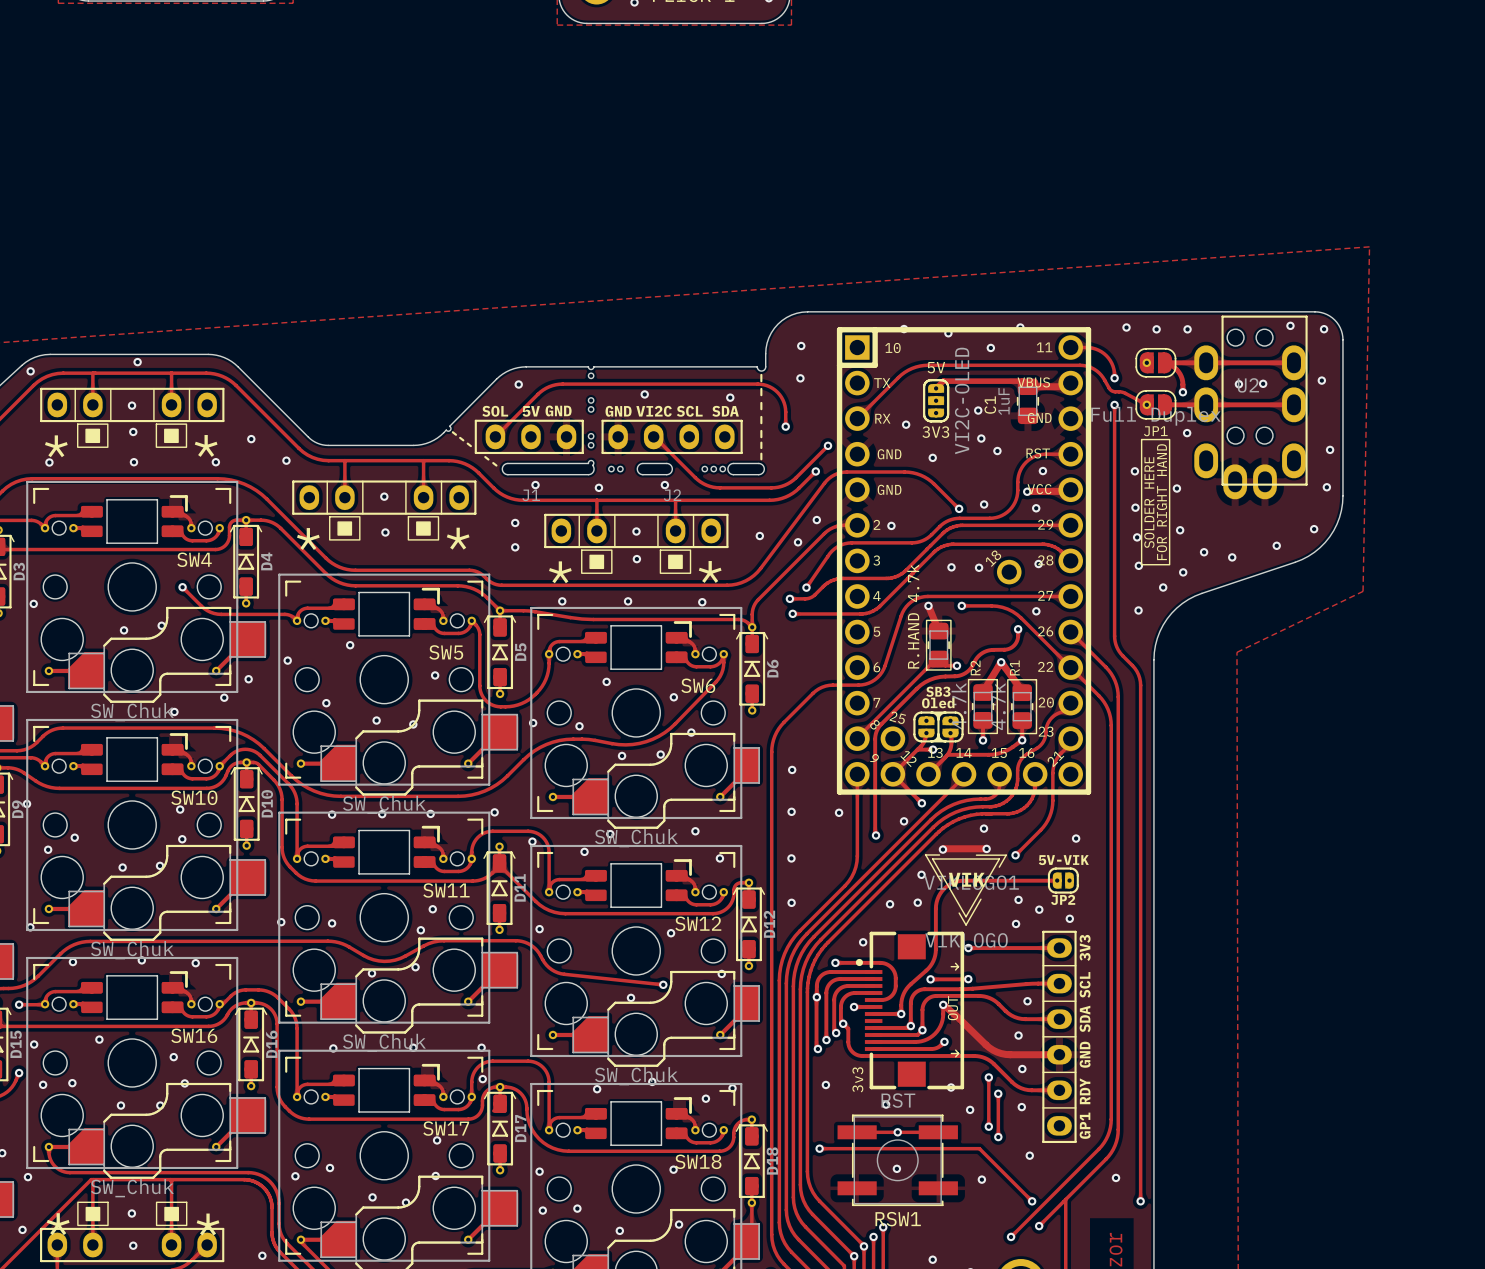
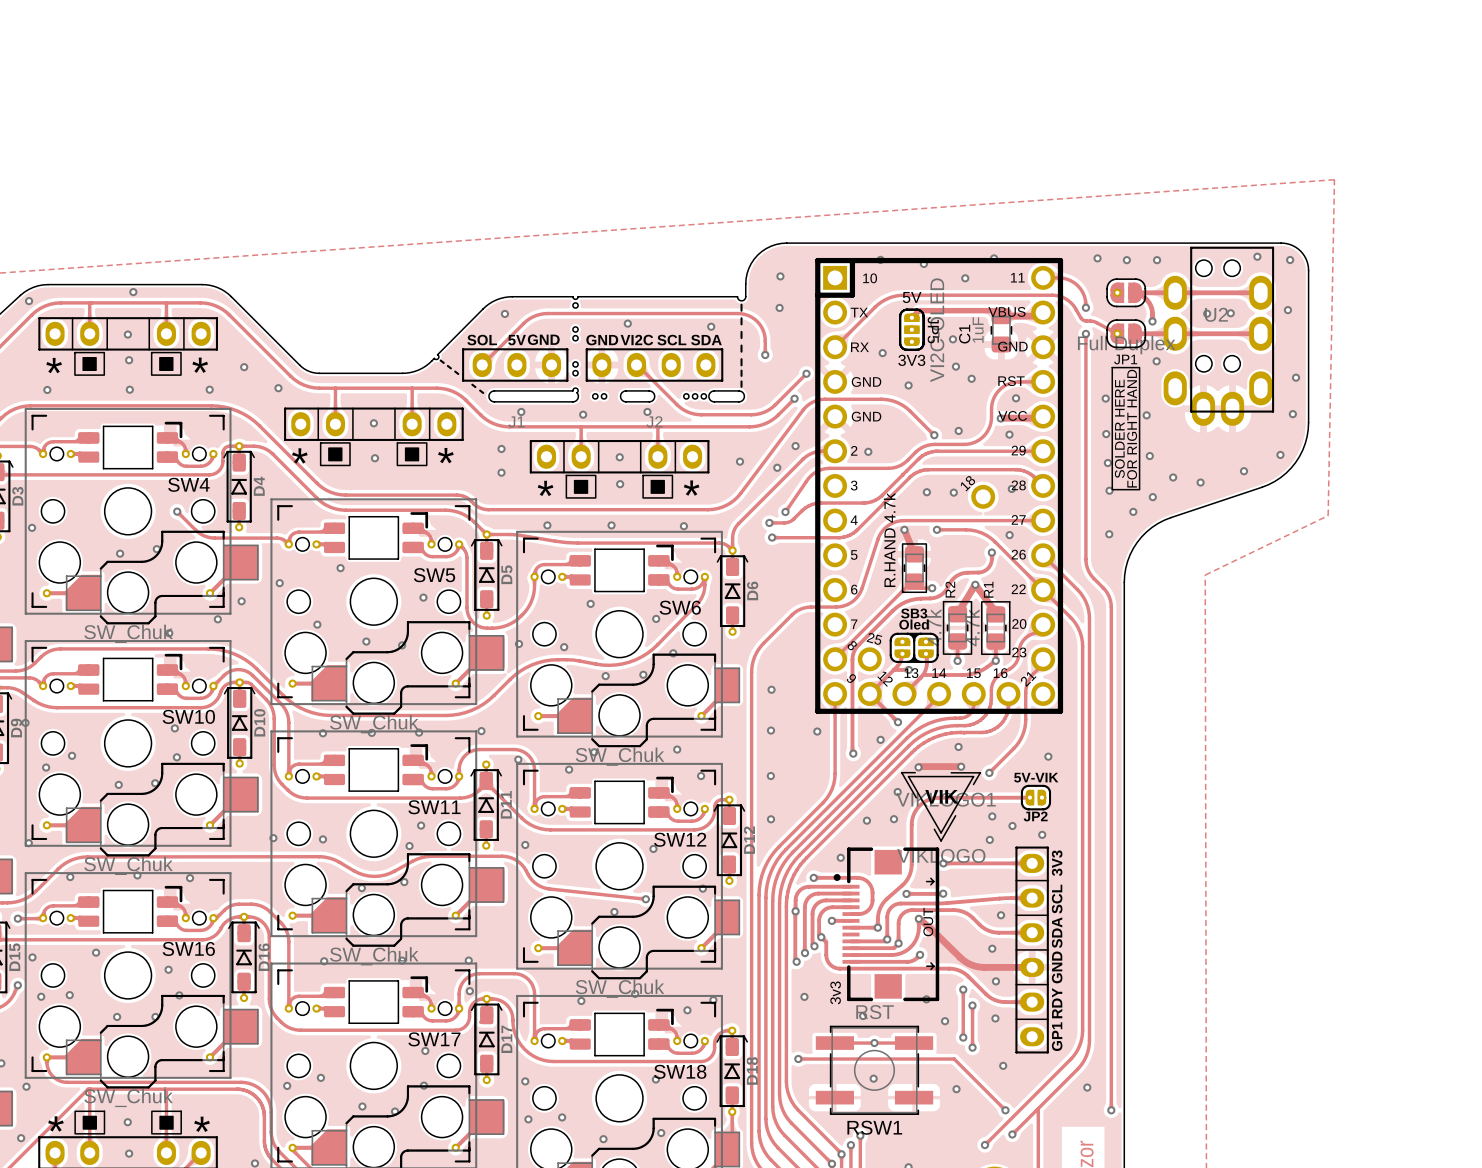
part text: none -> JP5 (933, 330)

